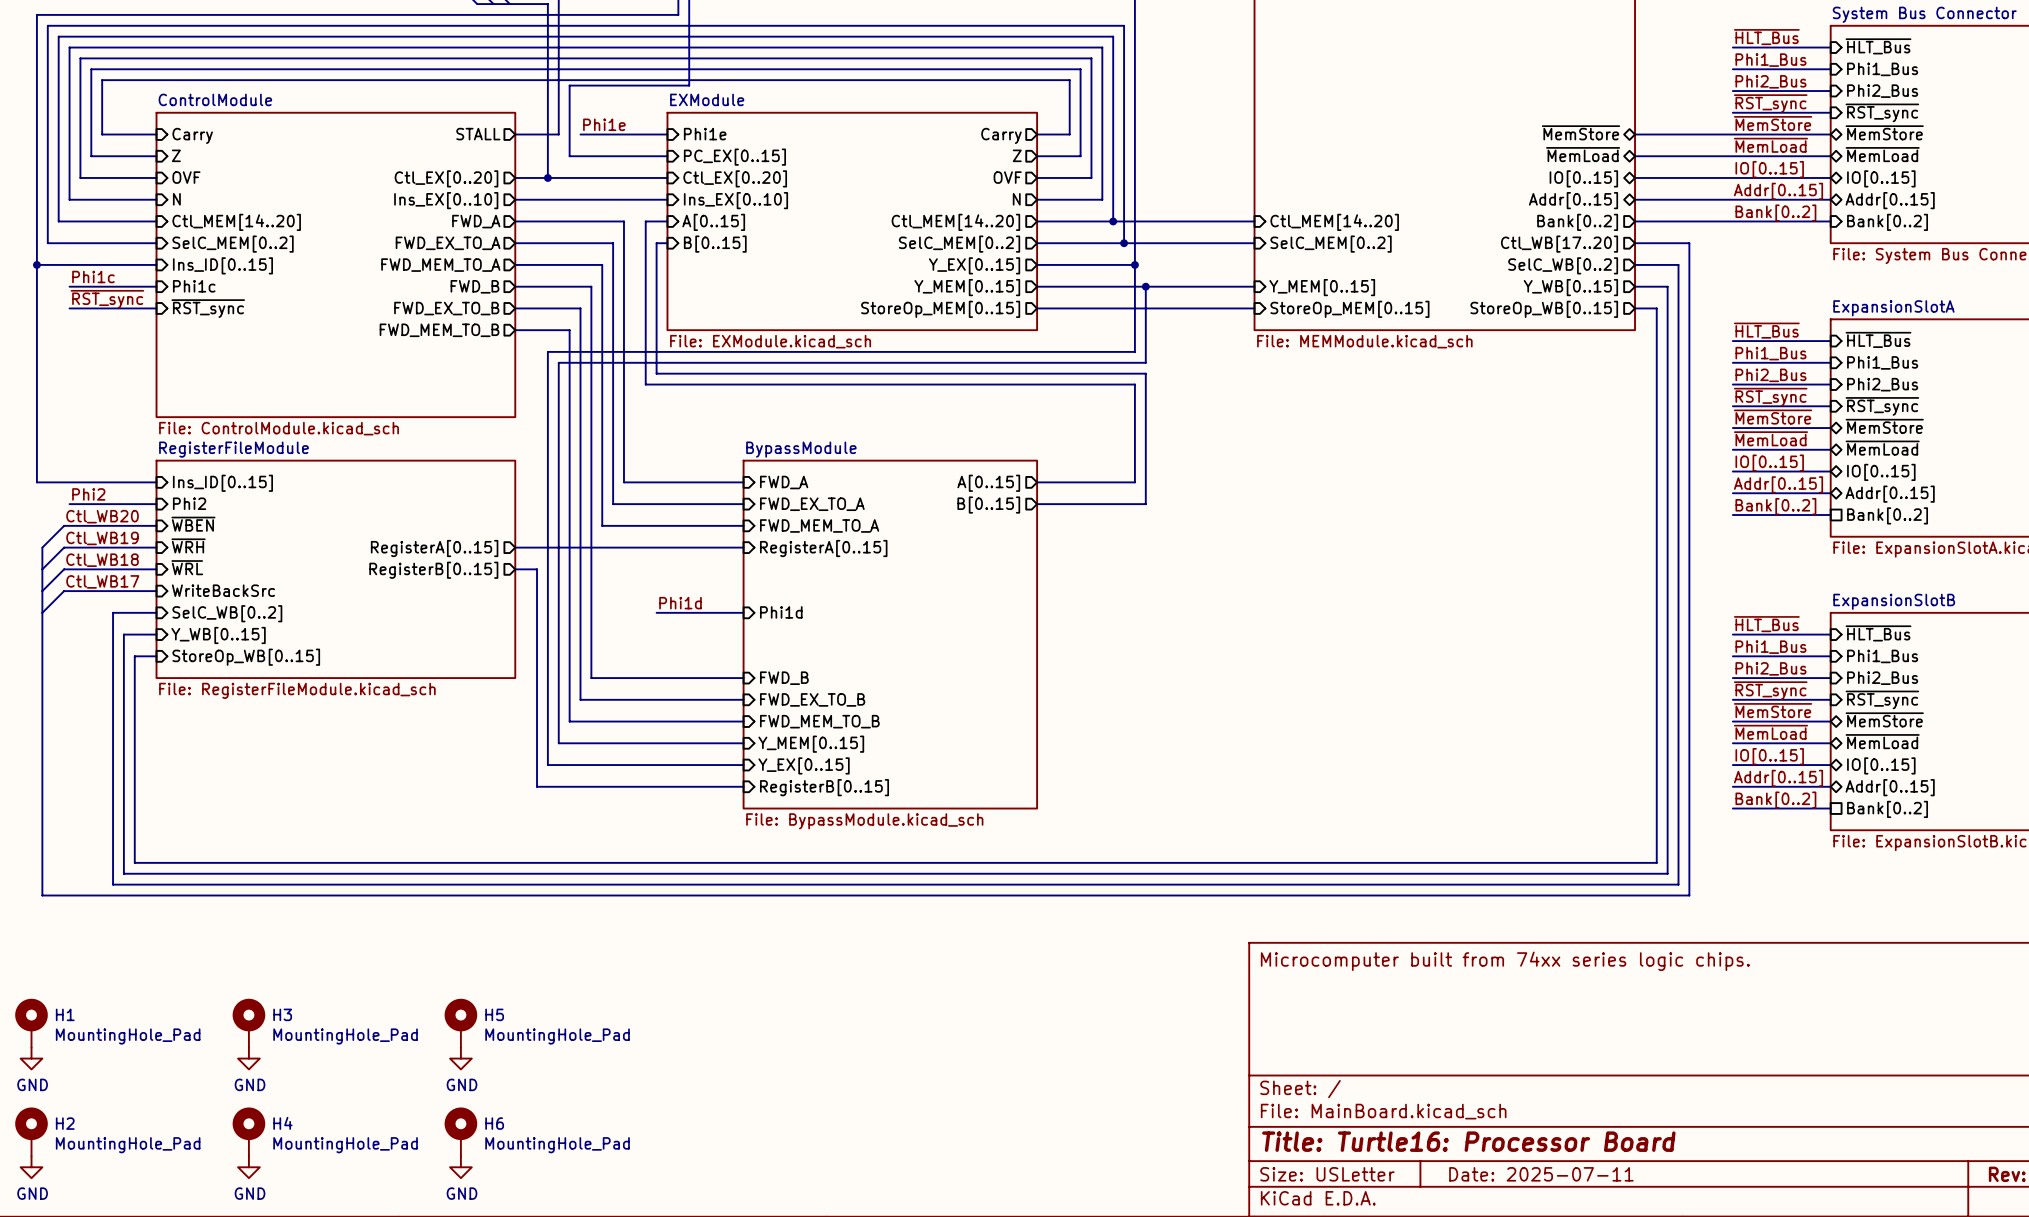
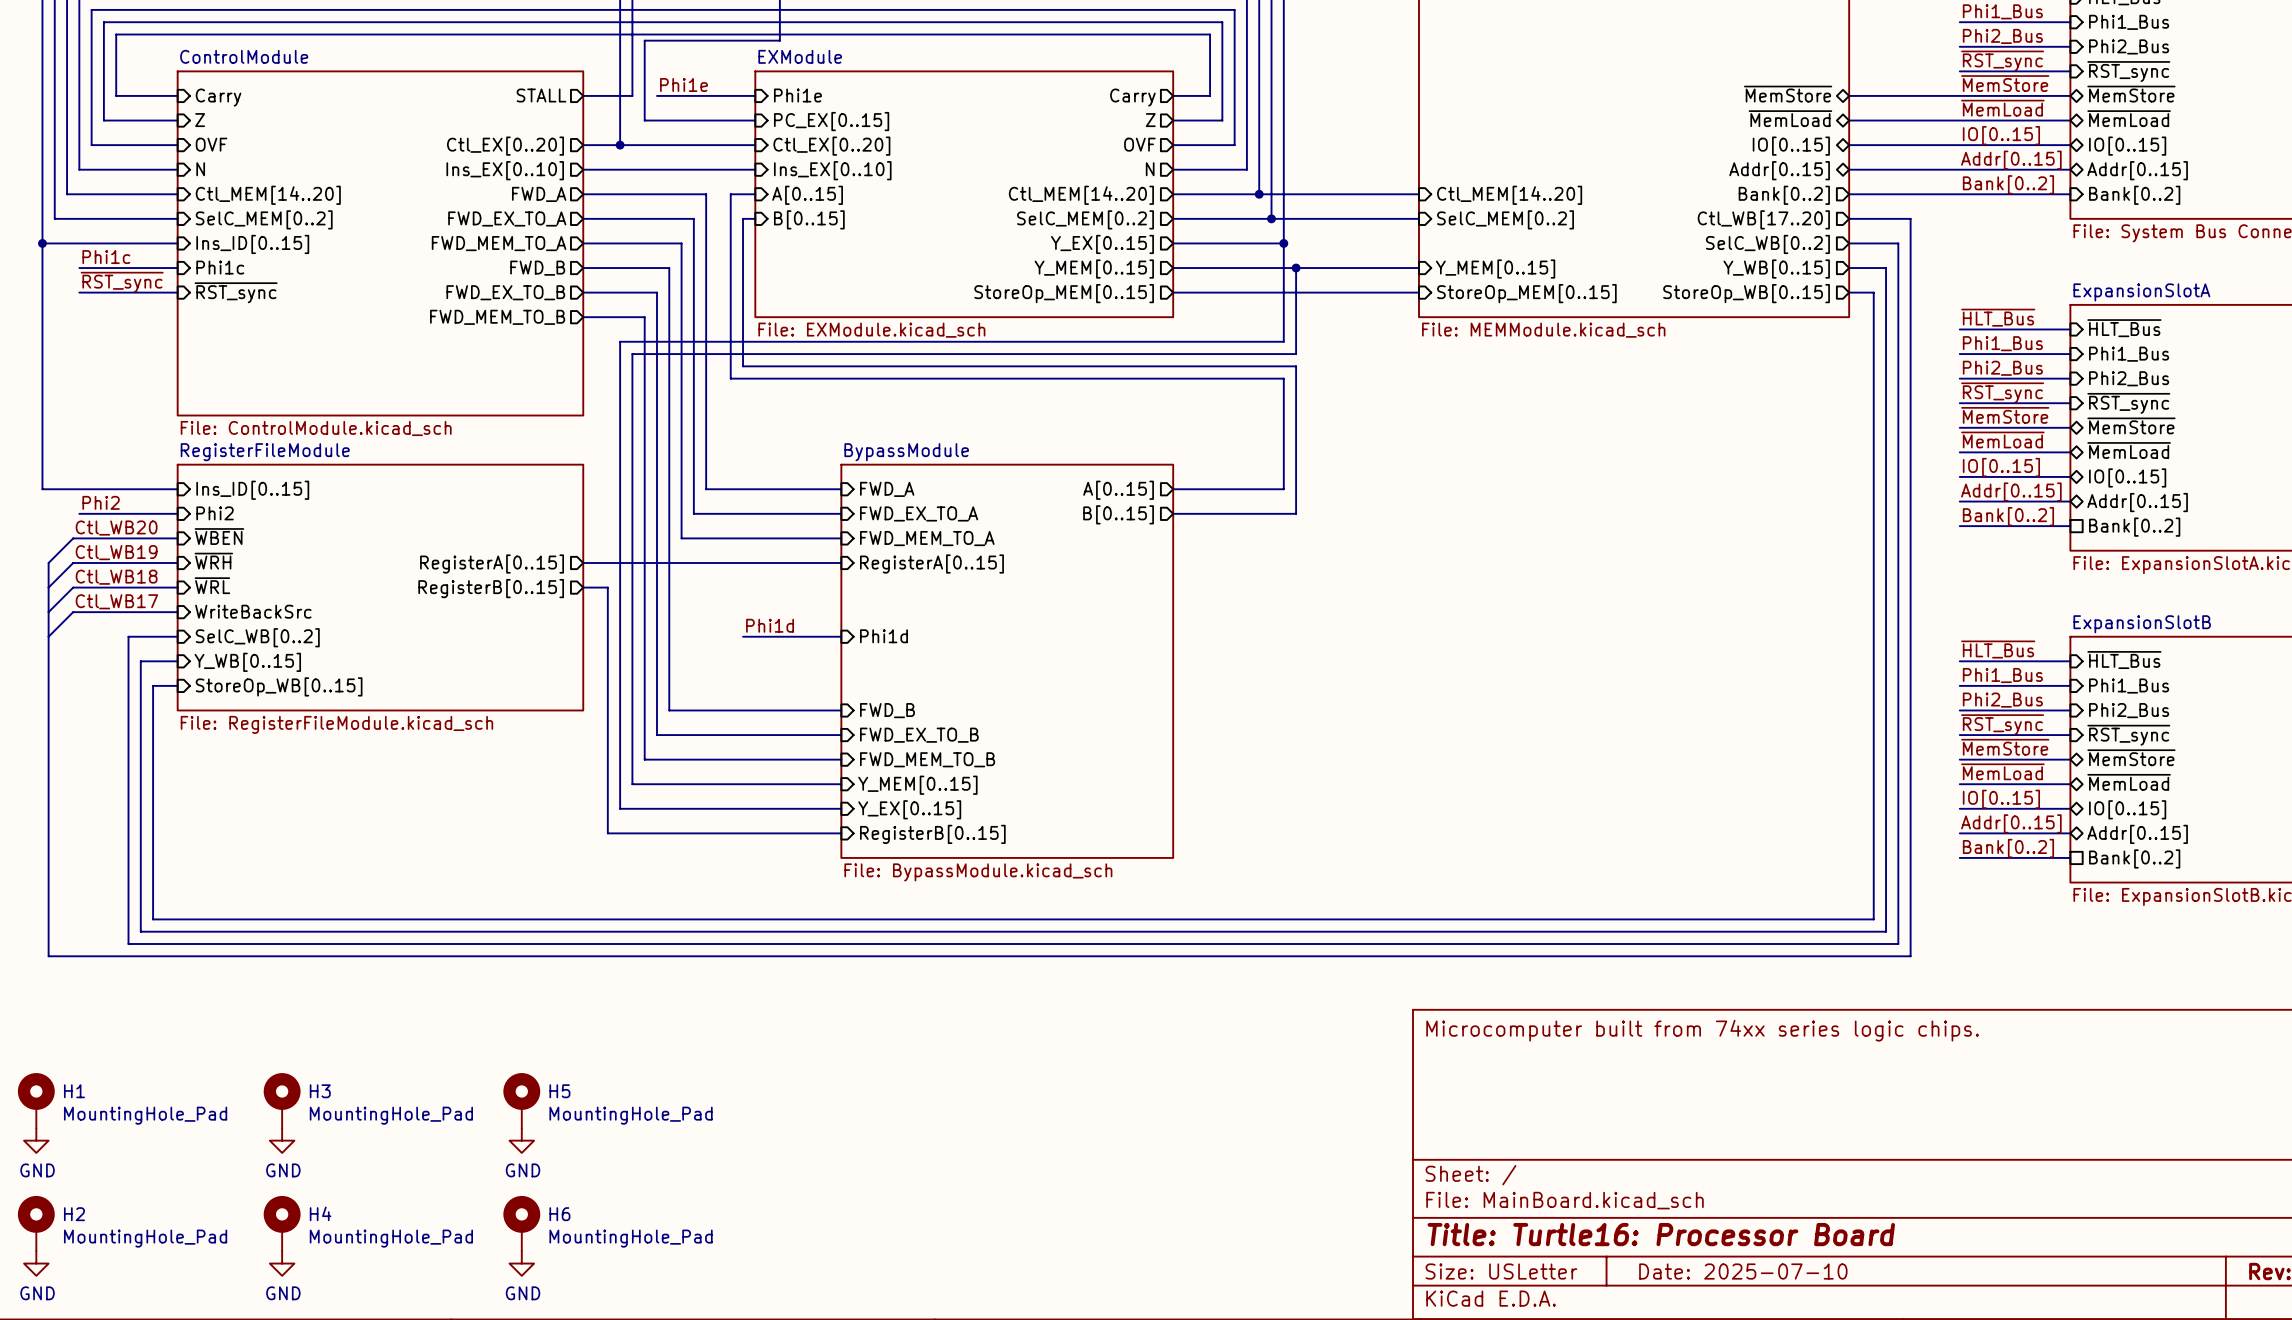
title block: Date: 2025-07-11 (1541, 1174) -> Date: 2025-07-10 (1743, 1271)

